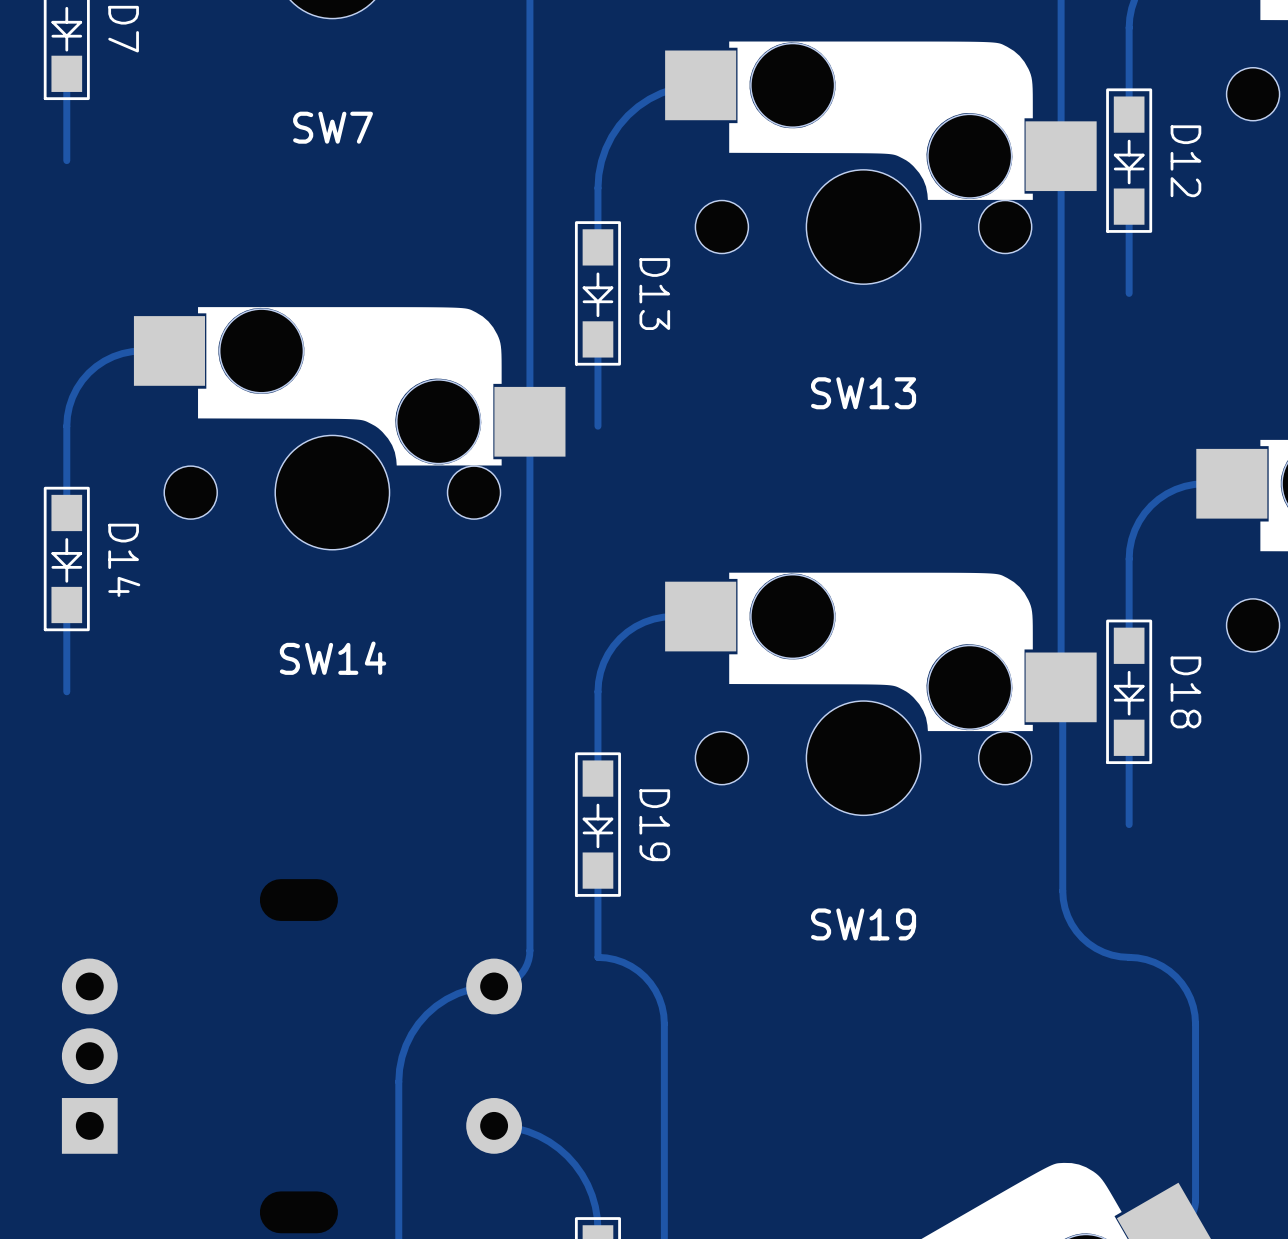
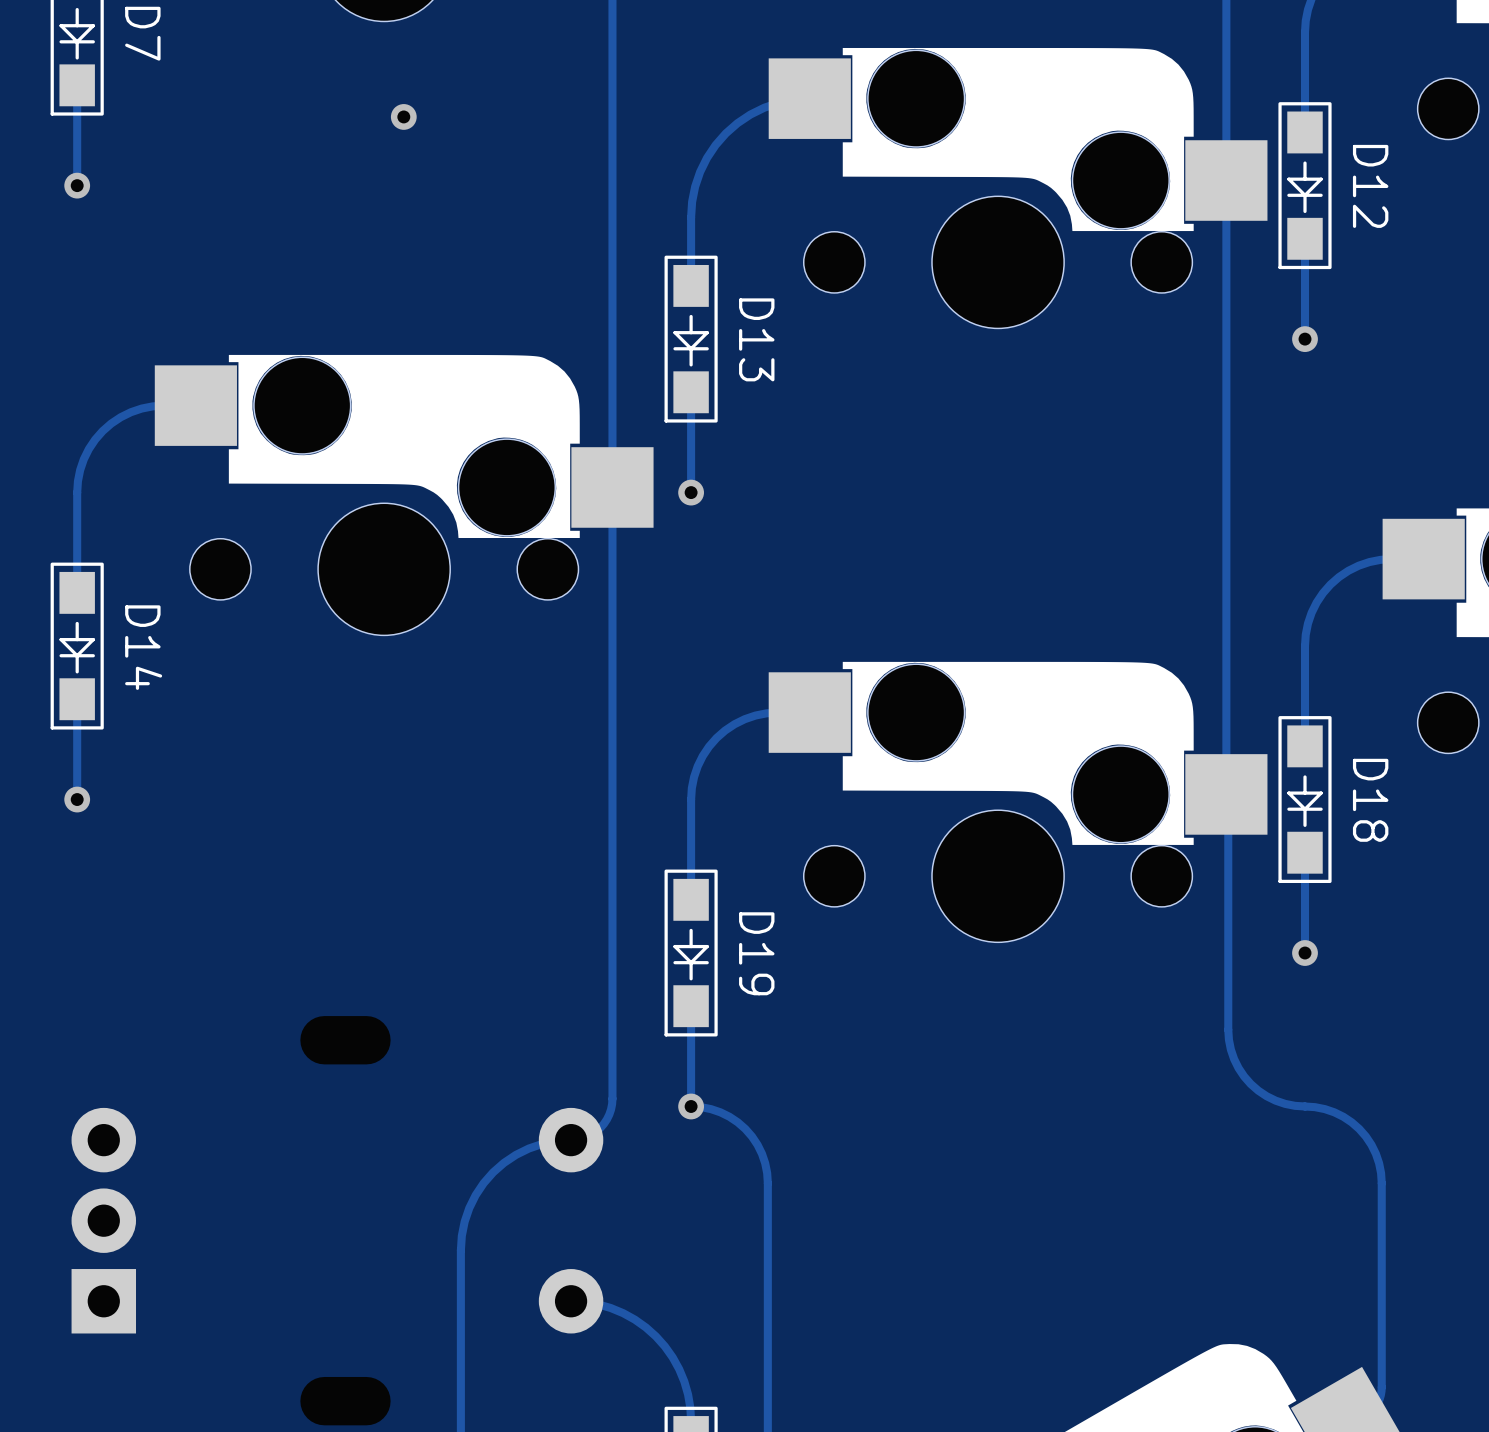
via: none -> (403, 116)
SW7 name: SW7 (333, 127) -> none
via: none -> (77, 185)
via: none -> (1305, 339)
SW13 name: SW13 (863, 393) -> none
via: none -> (691, 492)
SW14 name: SW14 (333, 658) -> none
via: none -> (77, 799)
via: none -> (1305, 953)
SW19 name: SW19 (863, 924) -> none
via: none -> (691, 1106)

